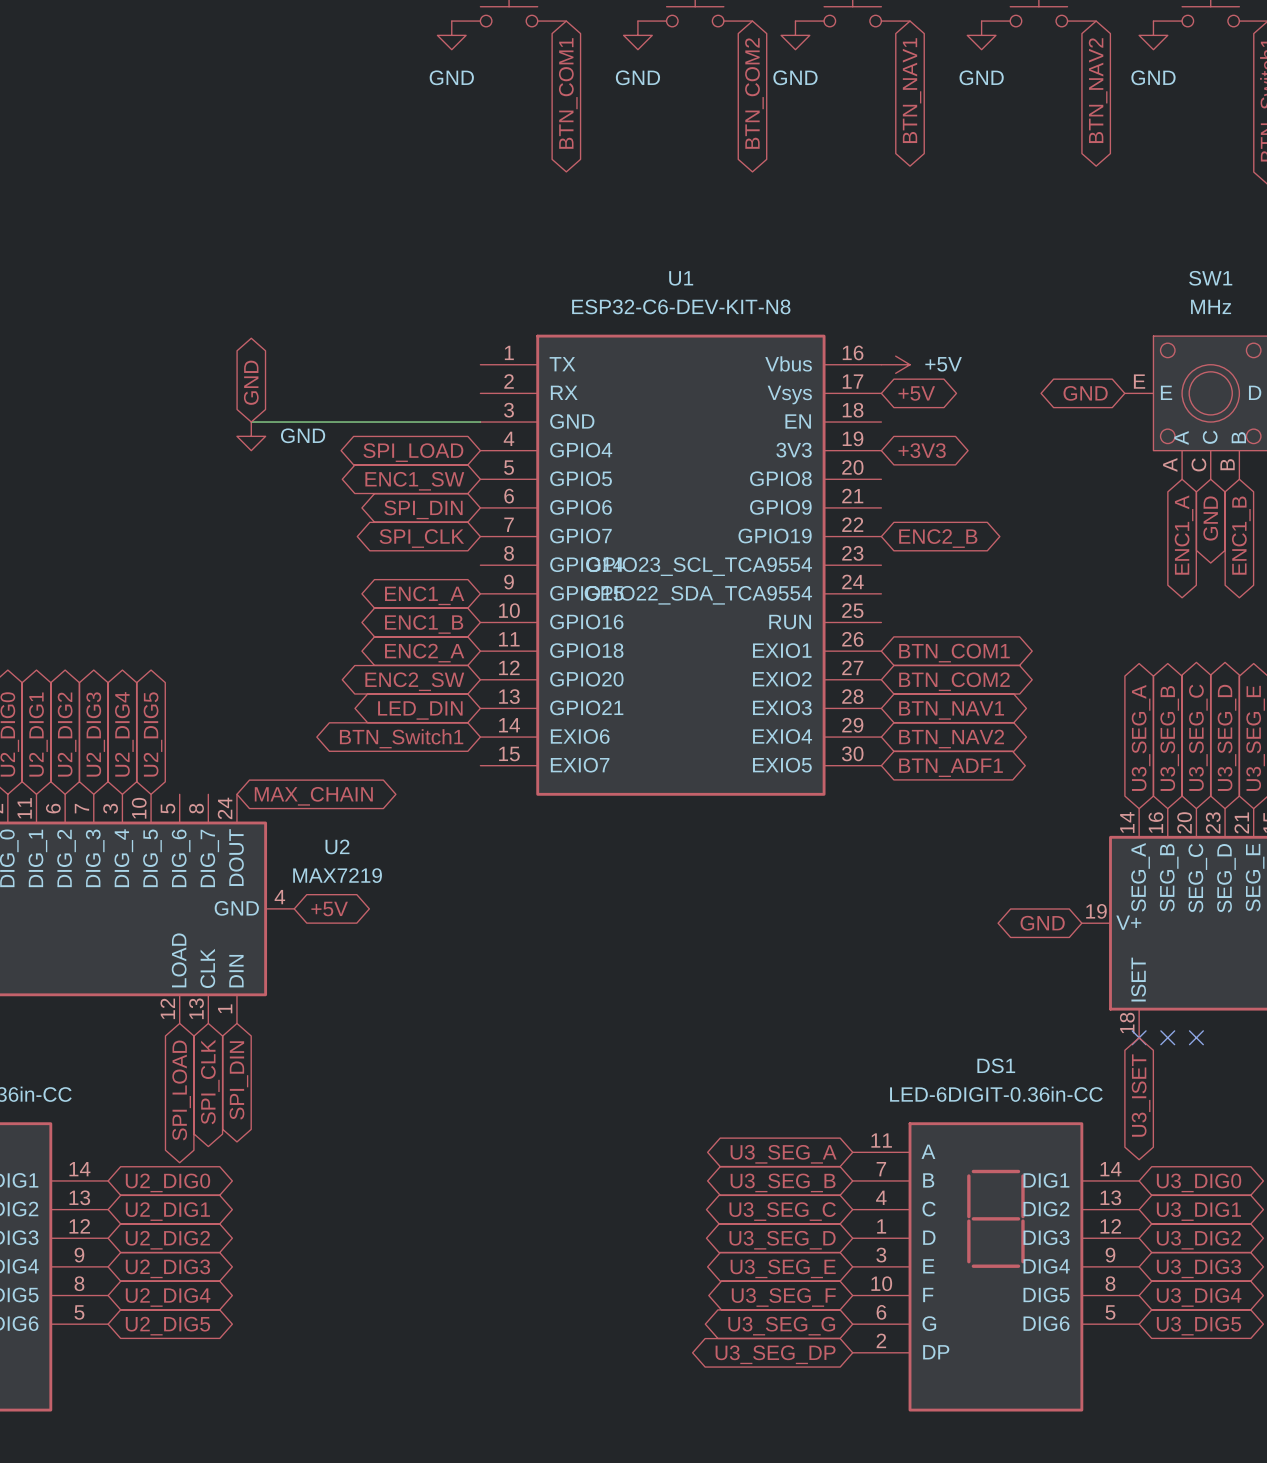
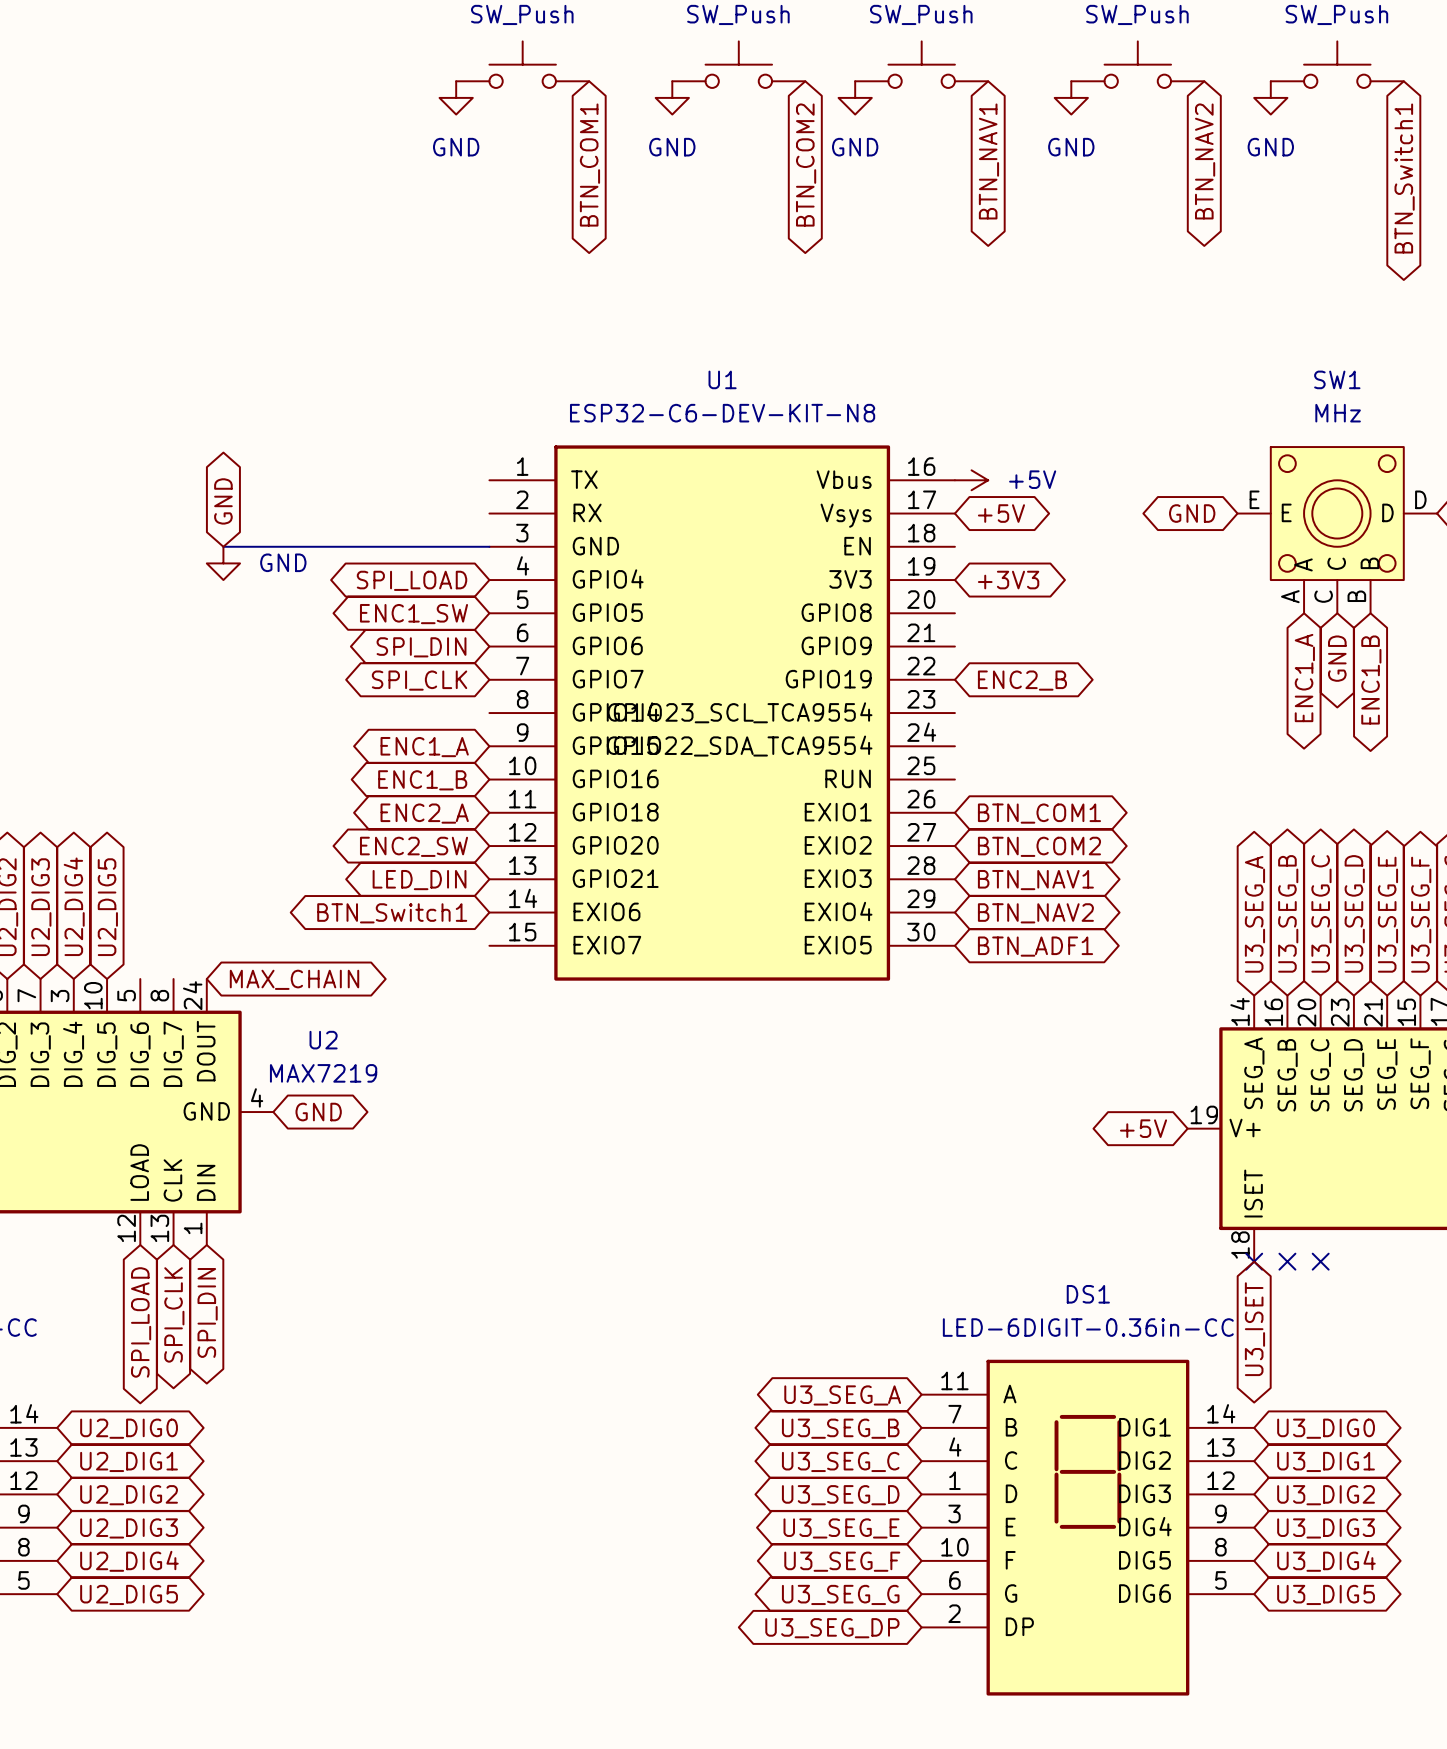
global label: +5V (329, 908) -> GND (318, 1112)
global label: GND (1042, 923) -> +5V (1143, 1128)

